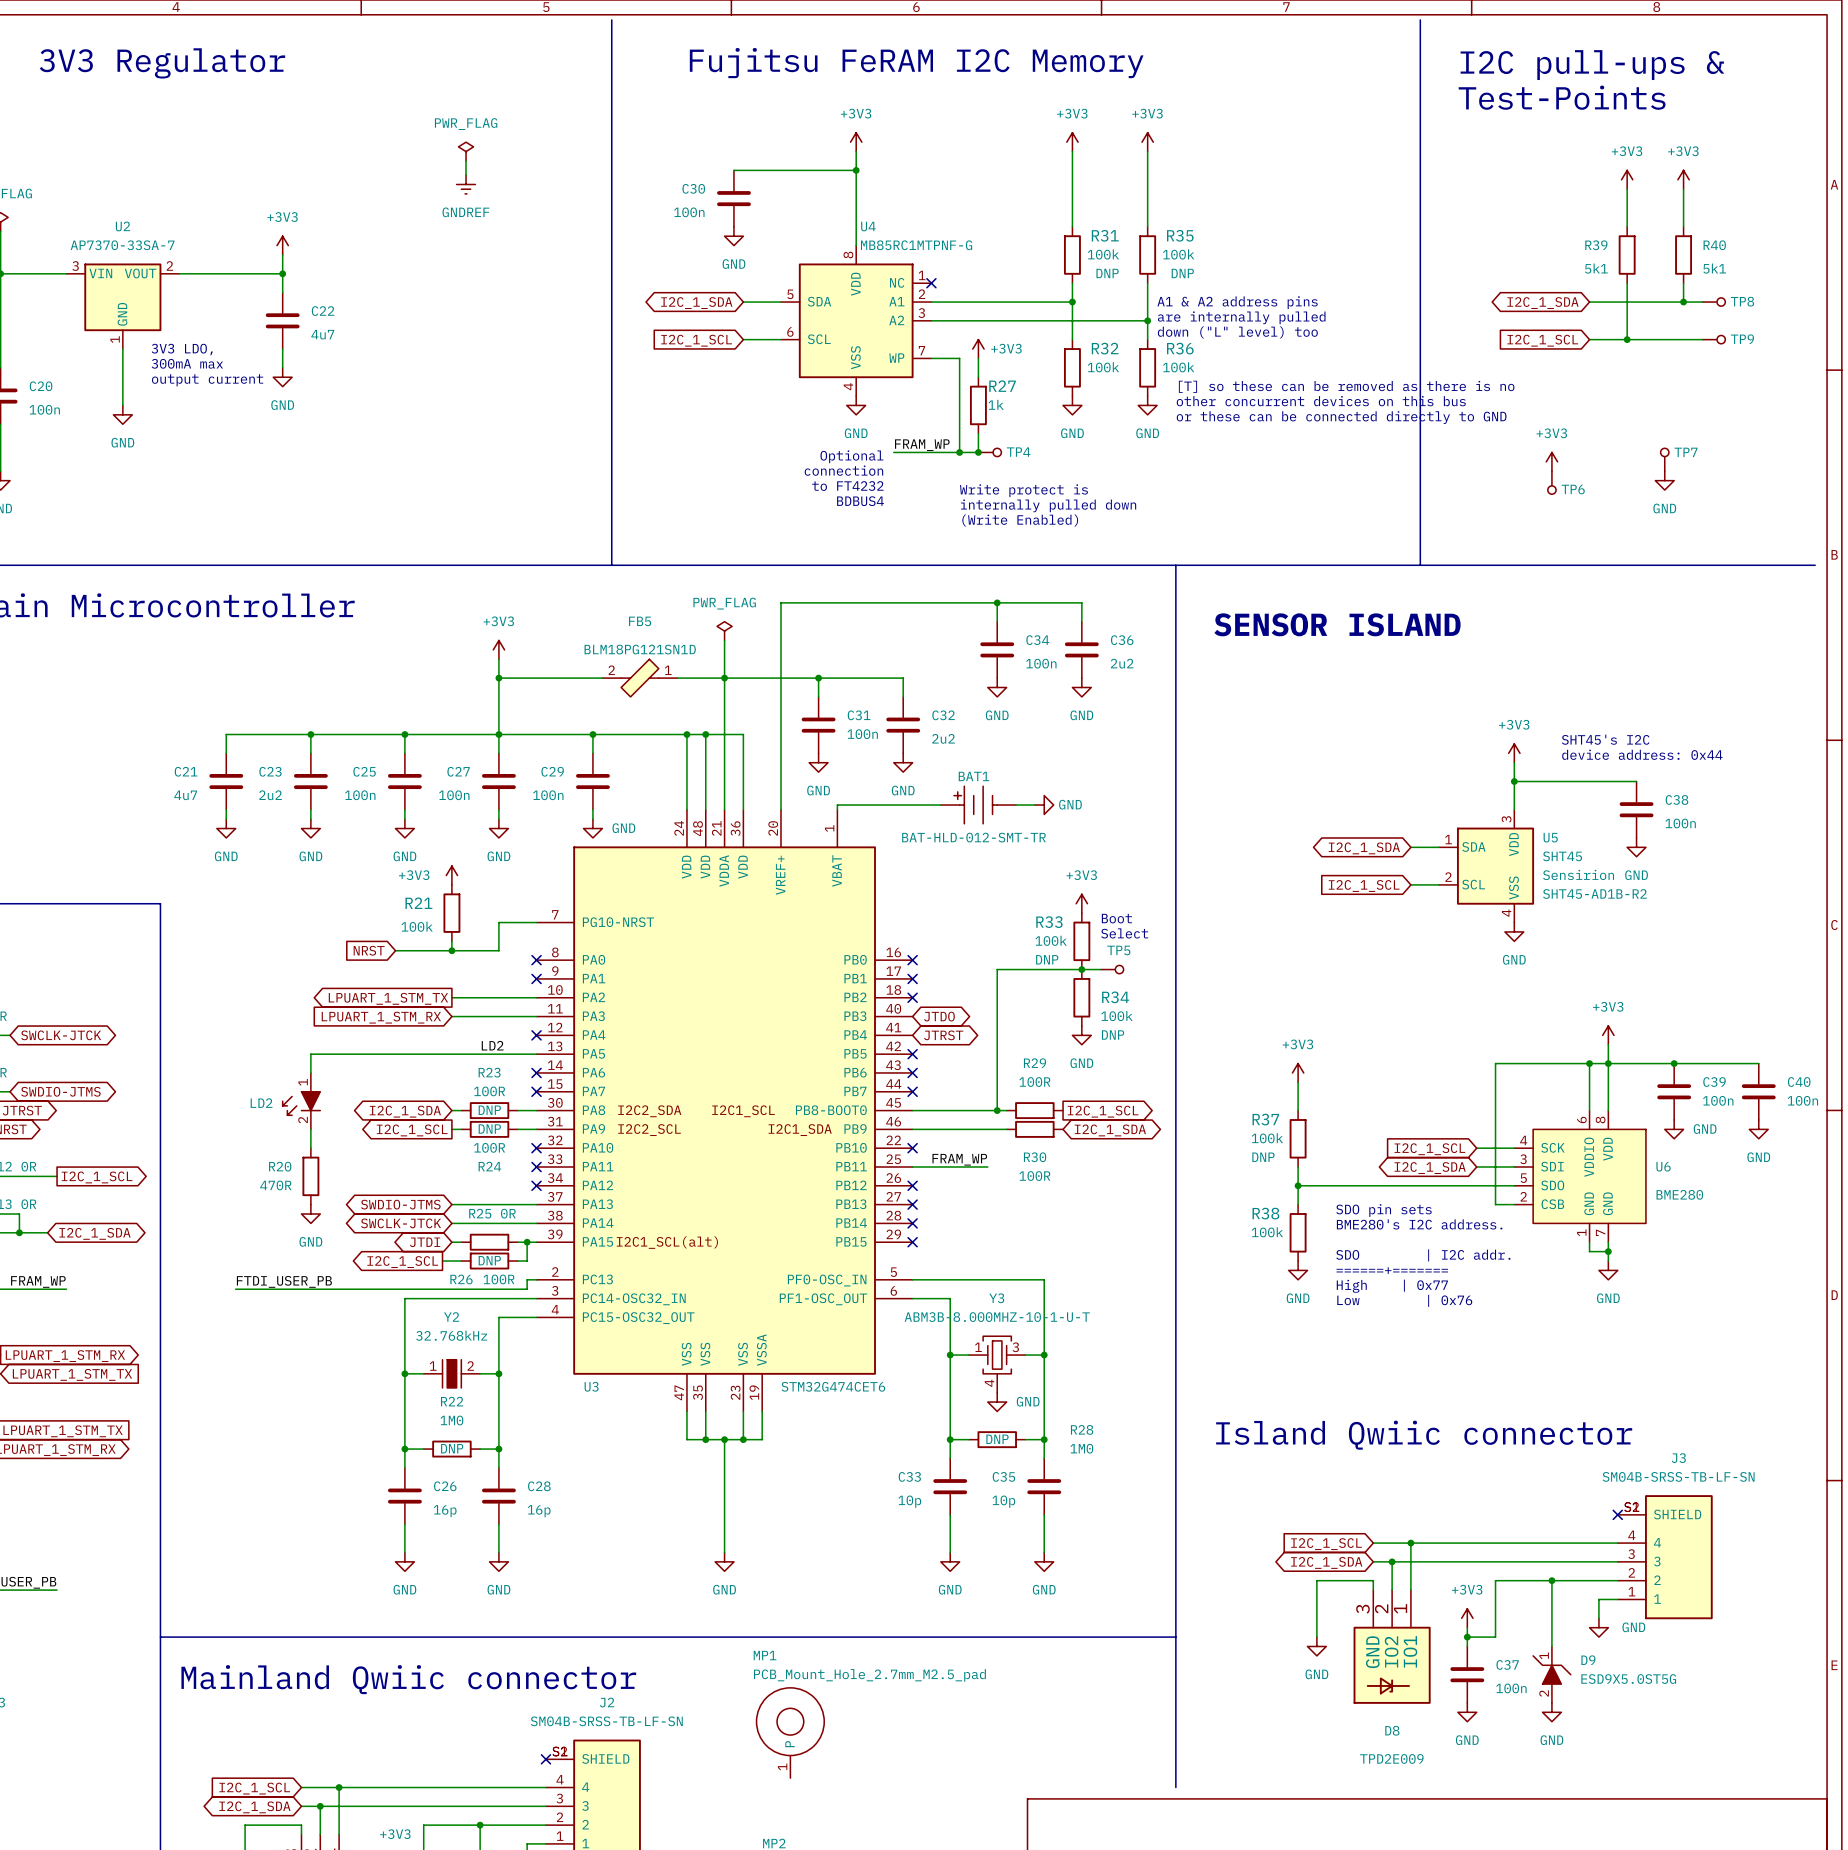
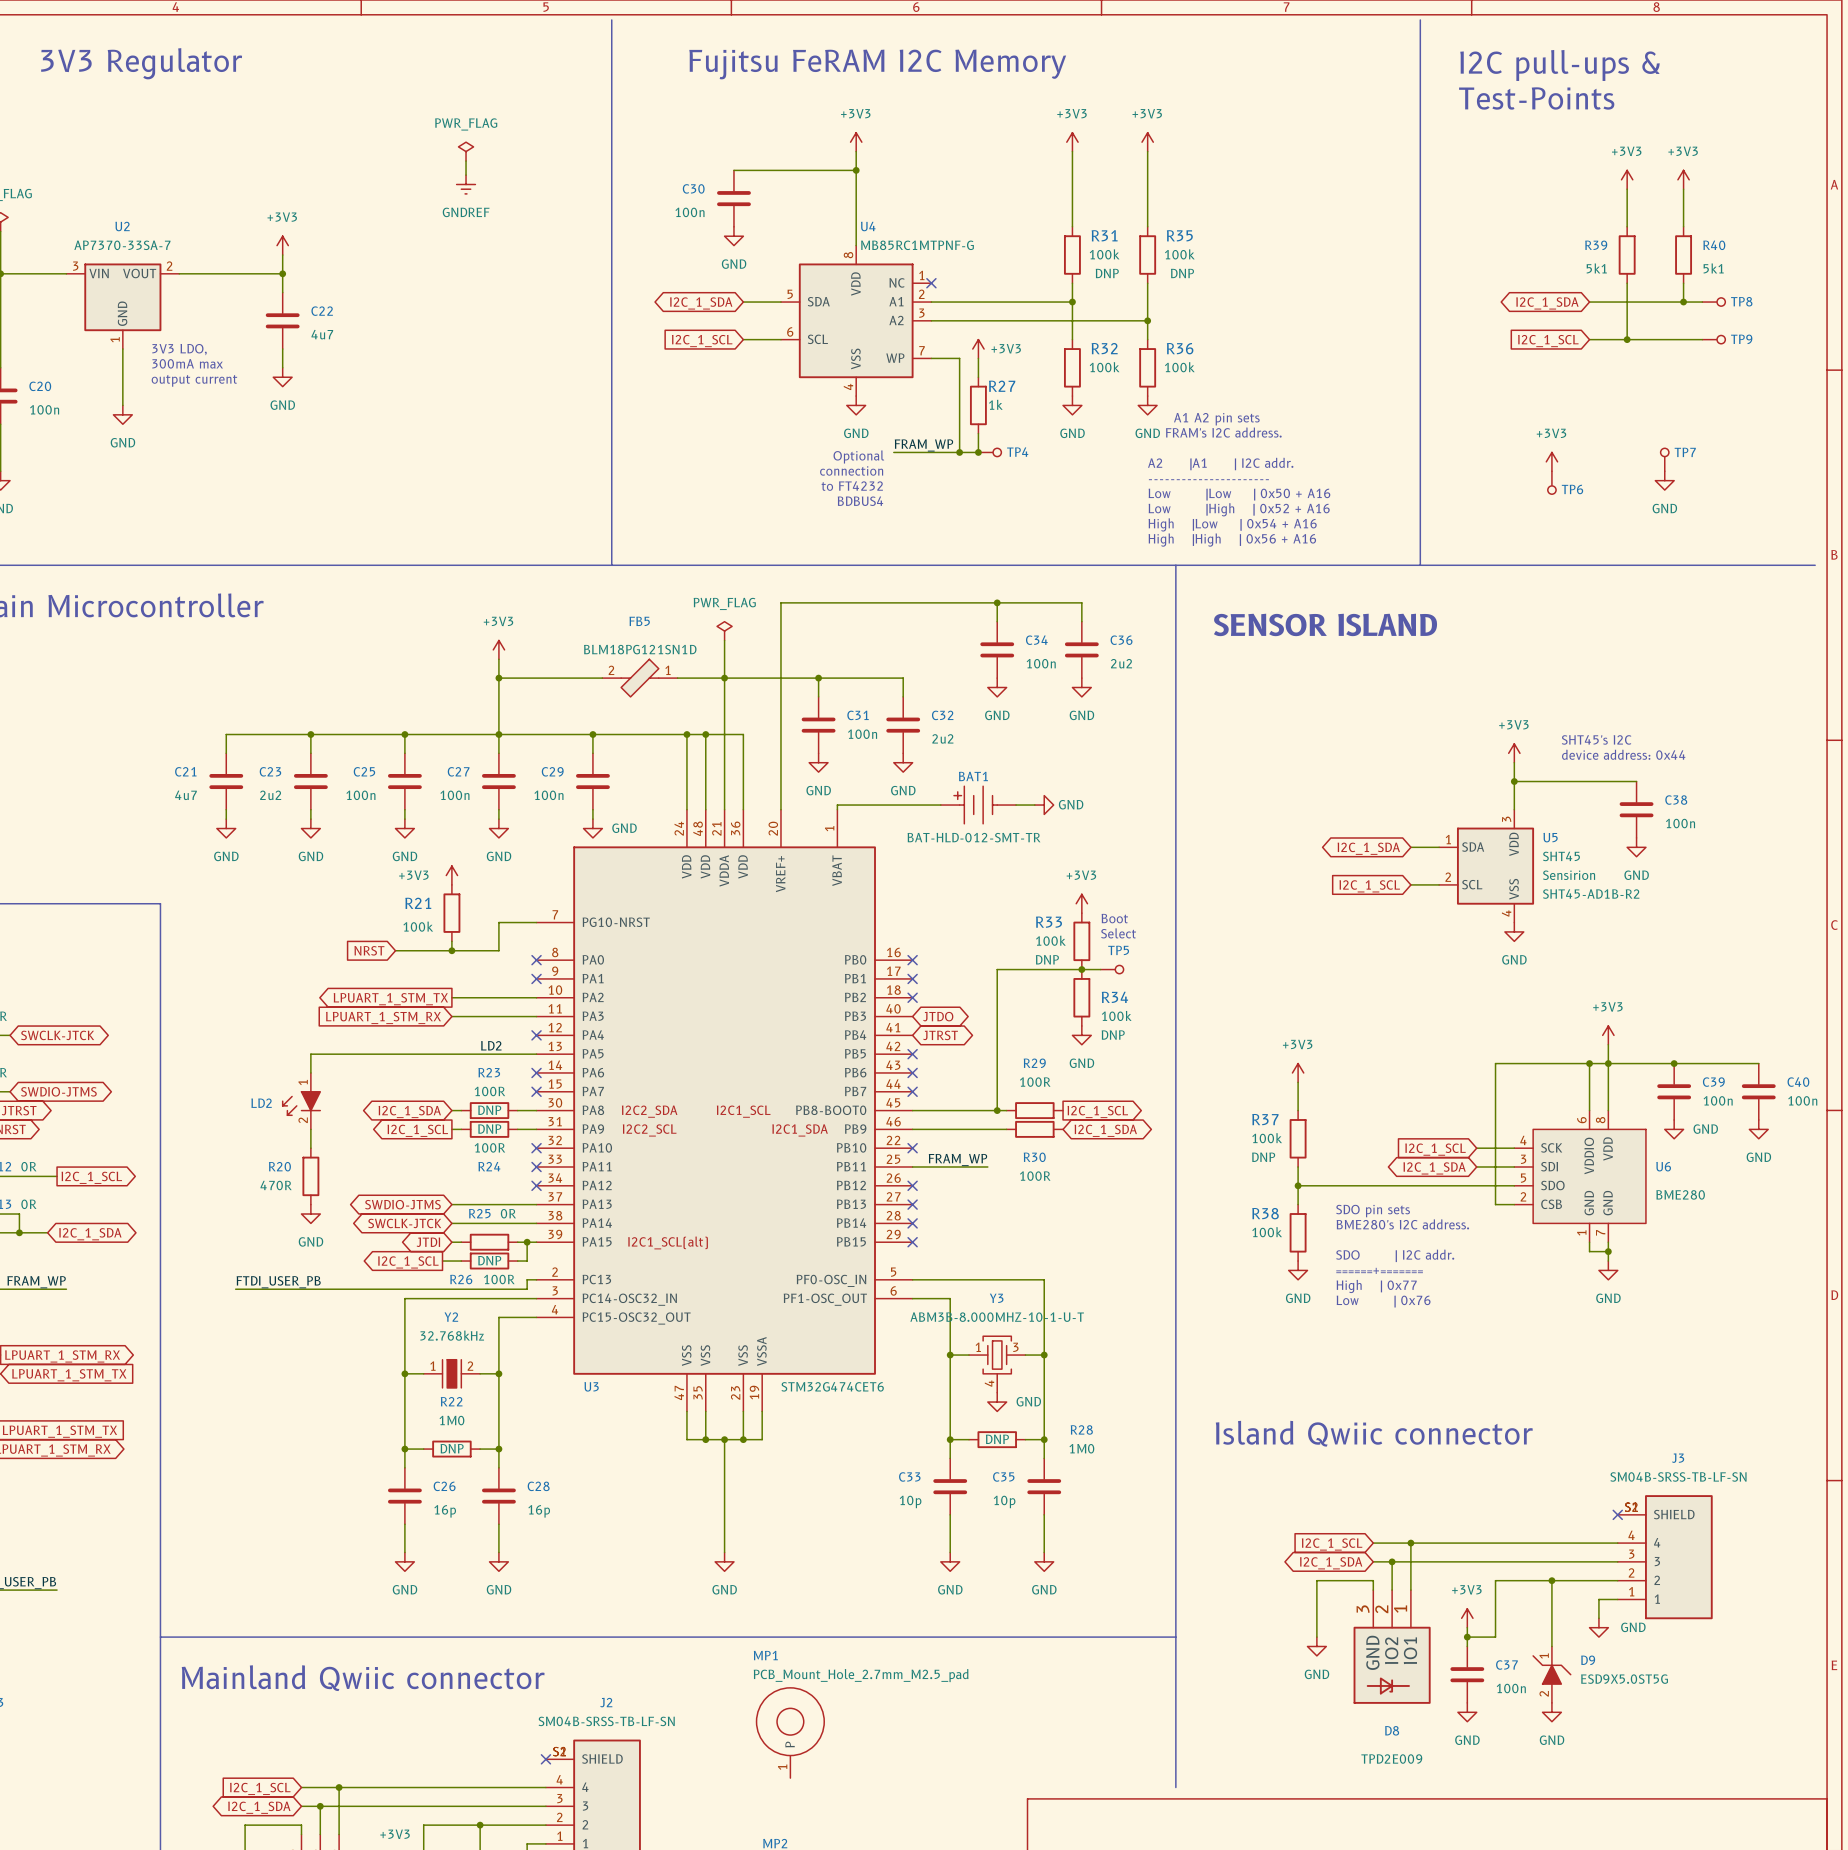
text: A1 & A2 address pins (1237, 302) -> none
text: are internally pulled (1241, 317) -> none
text: down ("L" level) too (1237, 332) -> none
text: [T] so these can be removed as there is no (1346, 386) -> none
text: other concurrent devices on this bus (1321, 401) -> none
text: or these can be connected directly to GND (1341, 417) -> none
text: none -> A1 A2 pin sets (1216, 419)
text: none -> FRAM's I2C address. (1223, 432)
text: none -> A2 |A1 | I2C addr. (1220, 464)
text: none -> ---------------------- (1208, 479)
text: Write protect is (1024, 490) -> none
text: none -> Low |Low | 0x50 + A16 (1239, 494)
text: internally pulled down (1048, 505) -> none
text: none -> Low |High | 0x52 + A16 (1239, 509)
text: (Write Enabled) (1020, 520) -> none
text: none -> High |Low | 0x54 + A16 (1232, 524)
text: none -> High |High | 0x56 + A16 (1232, 540)

